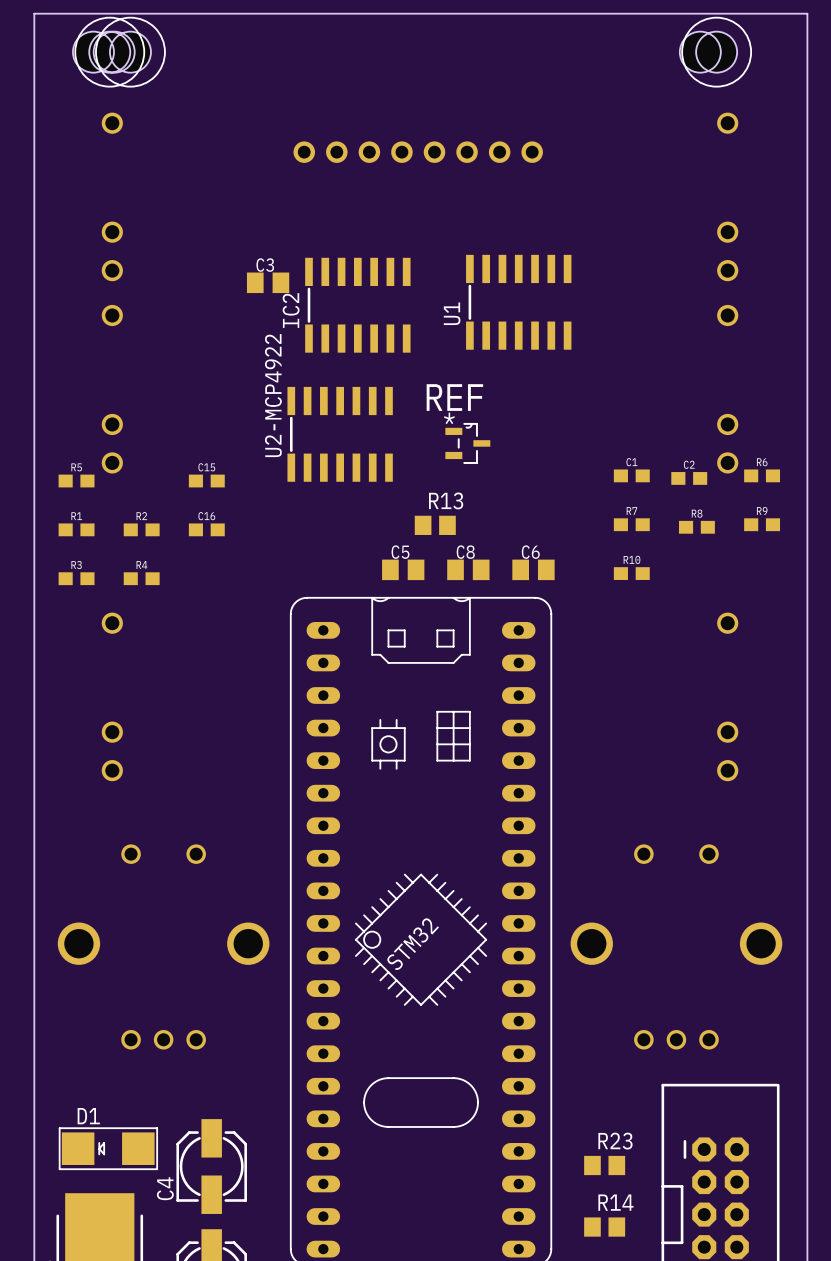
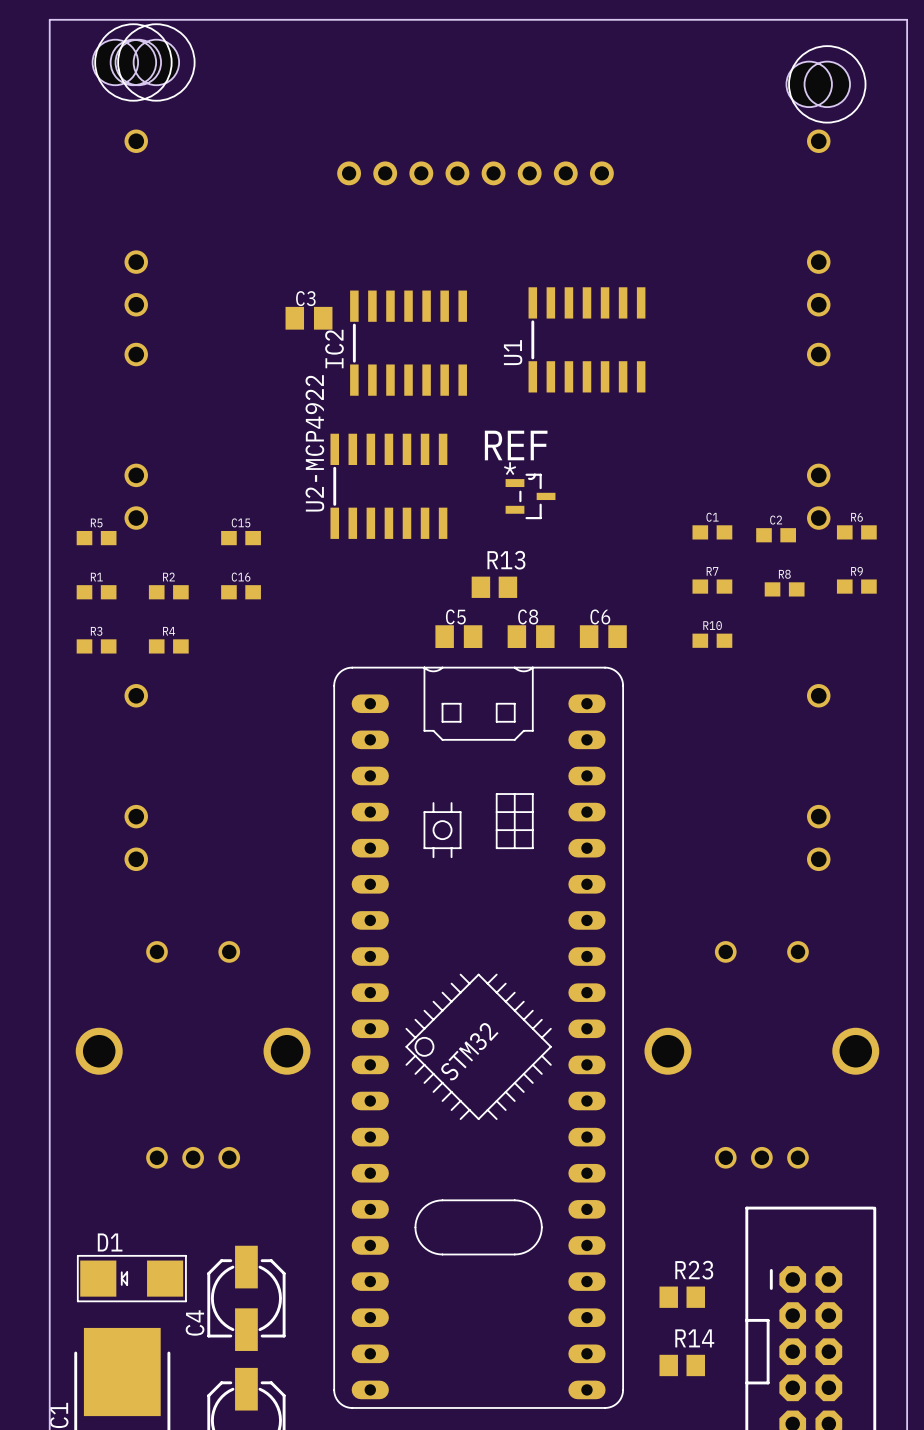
part position: (715, 52) -> (826, 84)

